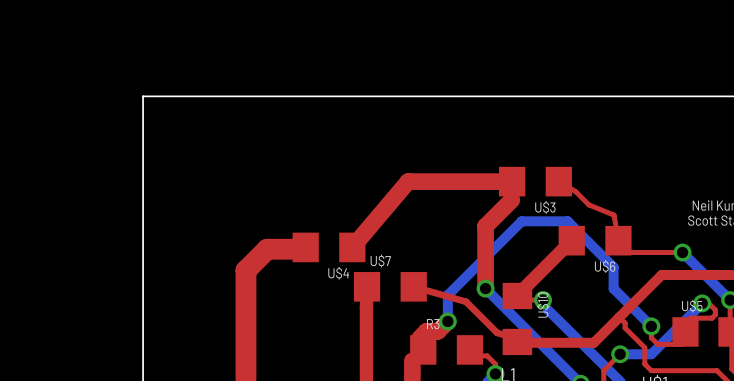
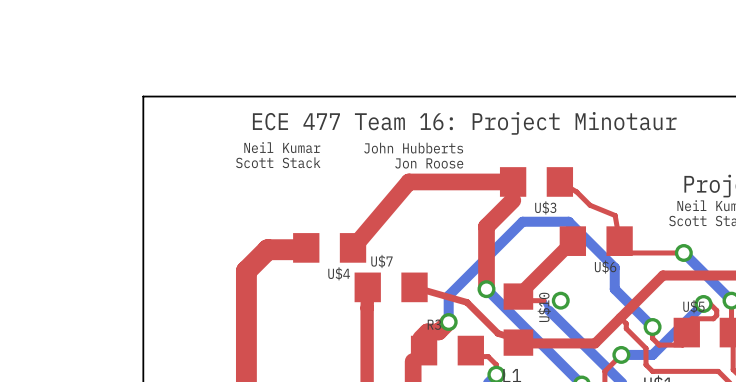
text: none -> ECE 477 Team 16: Project Minotaur (464, 123)
text: none -> Neil Kumar (282, 147)
text: none -> John Hubberts (413, 148)
text: none -> Scott Stack (278, 162)
text: none -> Jon Roose (429, 163)
via position: (543, 300) -> (560, 300)

